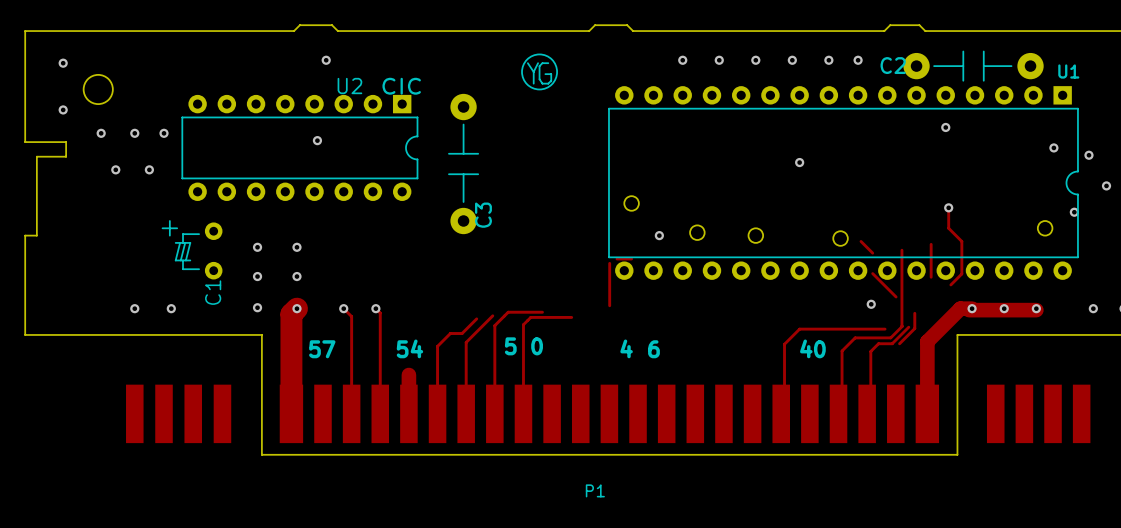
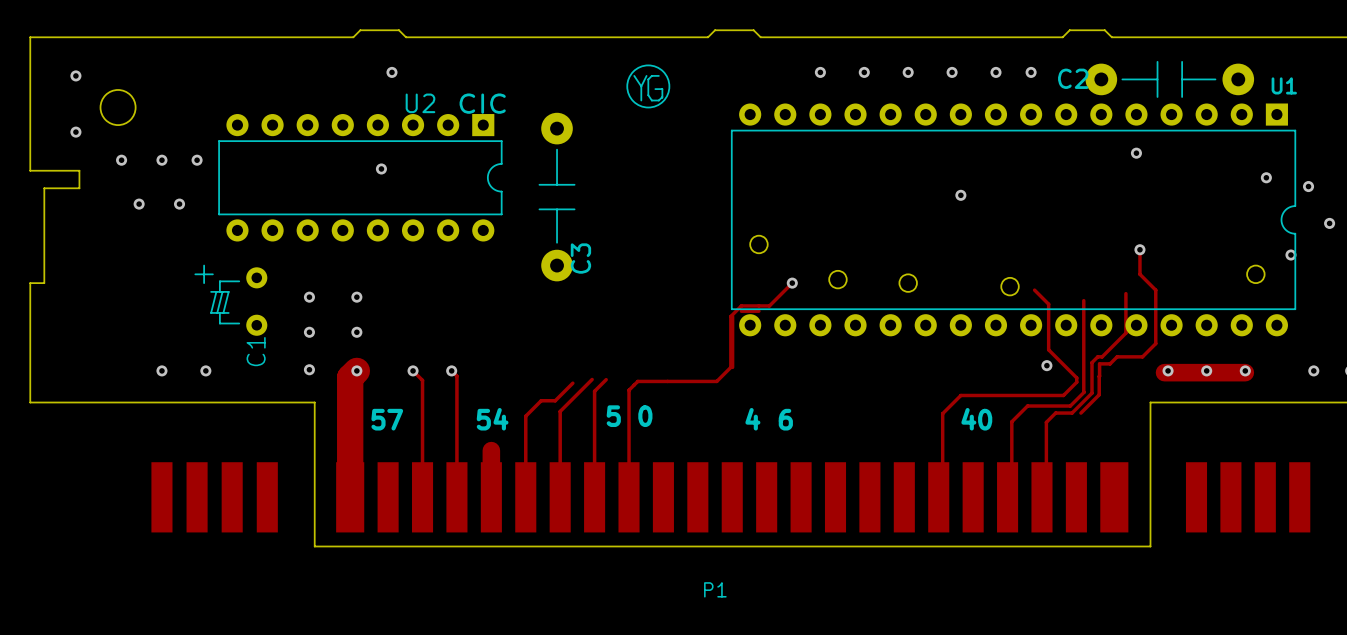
track: none -> (792, 283) (769, 305) (741, 305) (730, 316) (730, 367) (716, 381) (686, 381)
track: (931, 244) (931, 277) -> none
track: none -> (1125, 293) (1125, 333) (1102, 356) (1097, 356) (1092, 362) (1092, 393)
track: none -> (1048, 304) (1048, 349) (1076, 377) (1076, 382) (1063, 395)
track: (872, 273) (896, 296) -> none
track: (961, 273) (950, 284) -> (1155, 329) (1155, 343) (1142, 356) (1117, 356) (1110, 363) (1099, 363) (1099, 376)
track: (972, 308) (960, 308) (927, 341) (927, 413) -> none
track: (542, 312) (508, 312) (504, 315) -> none

